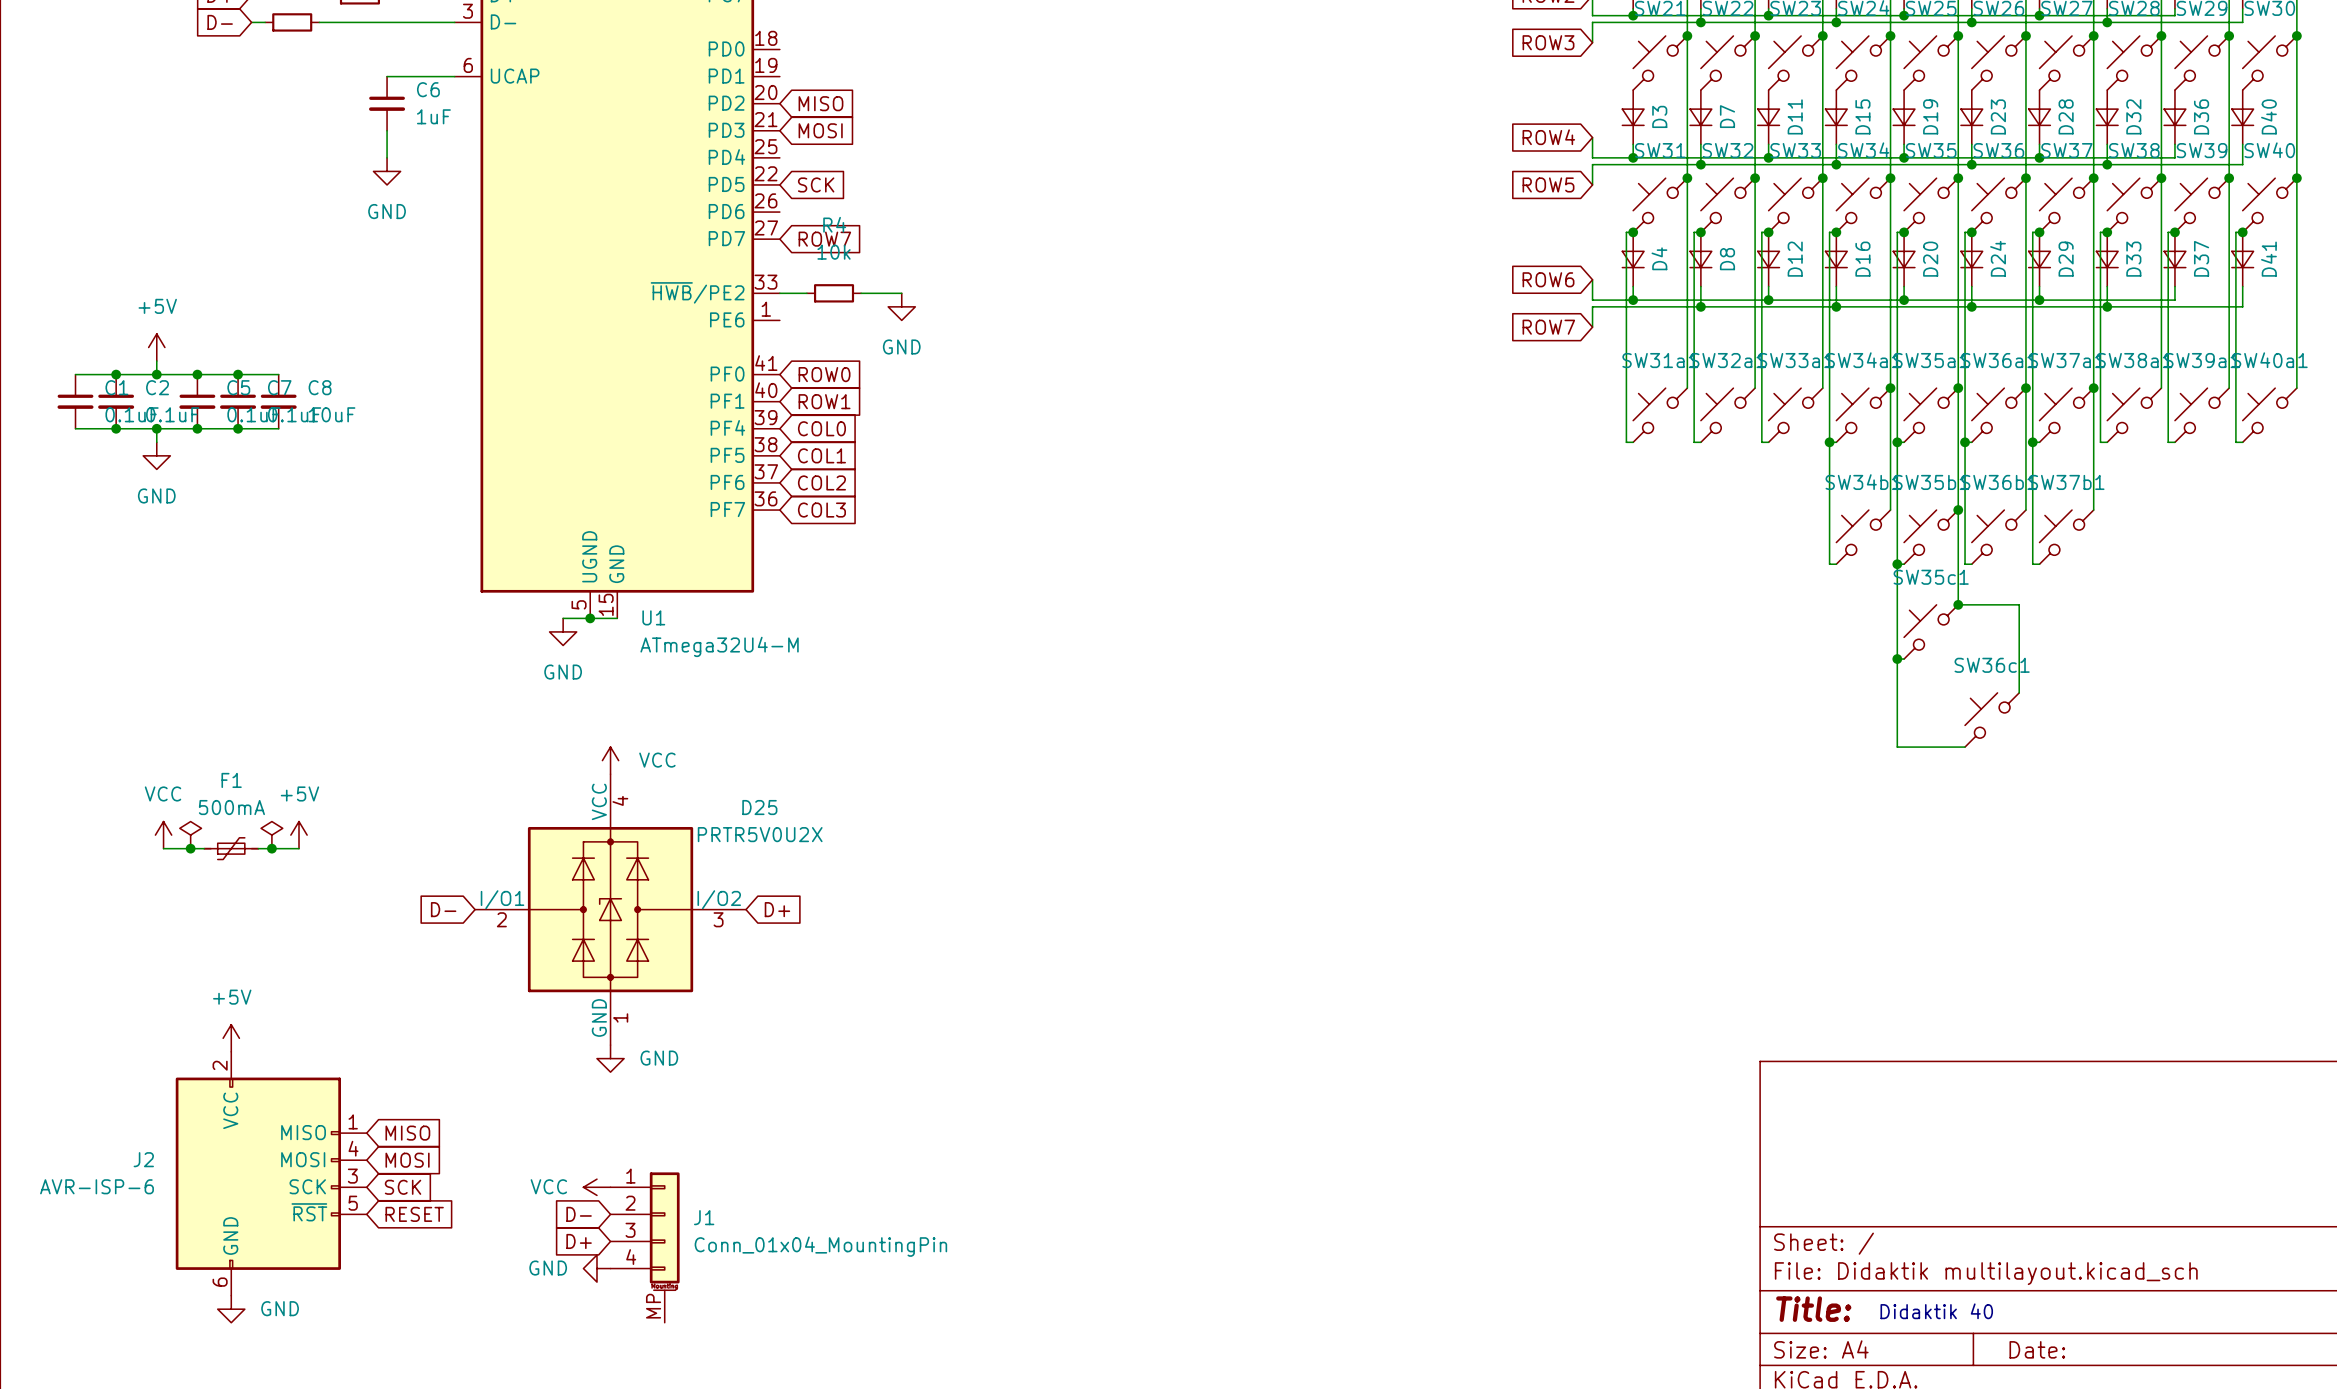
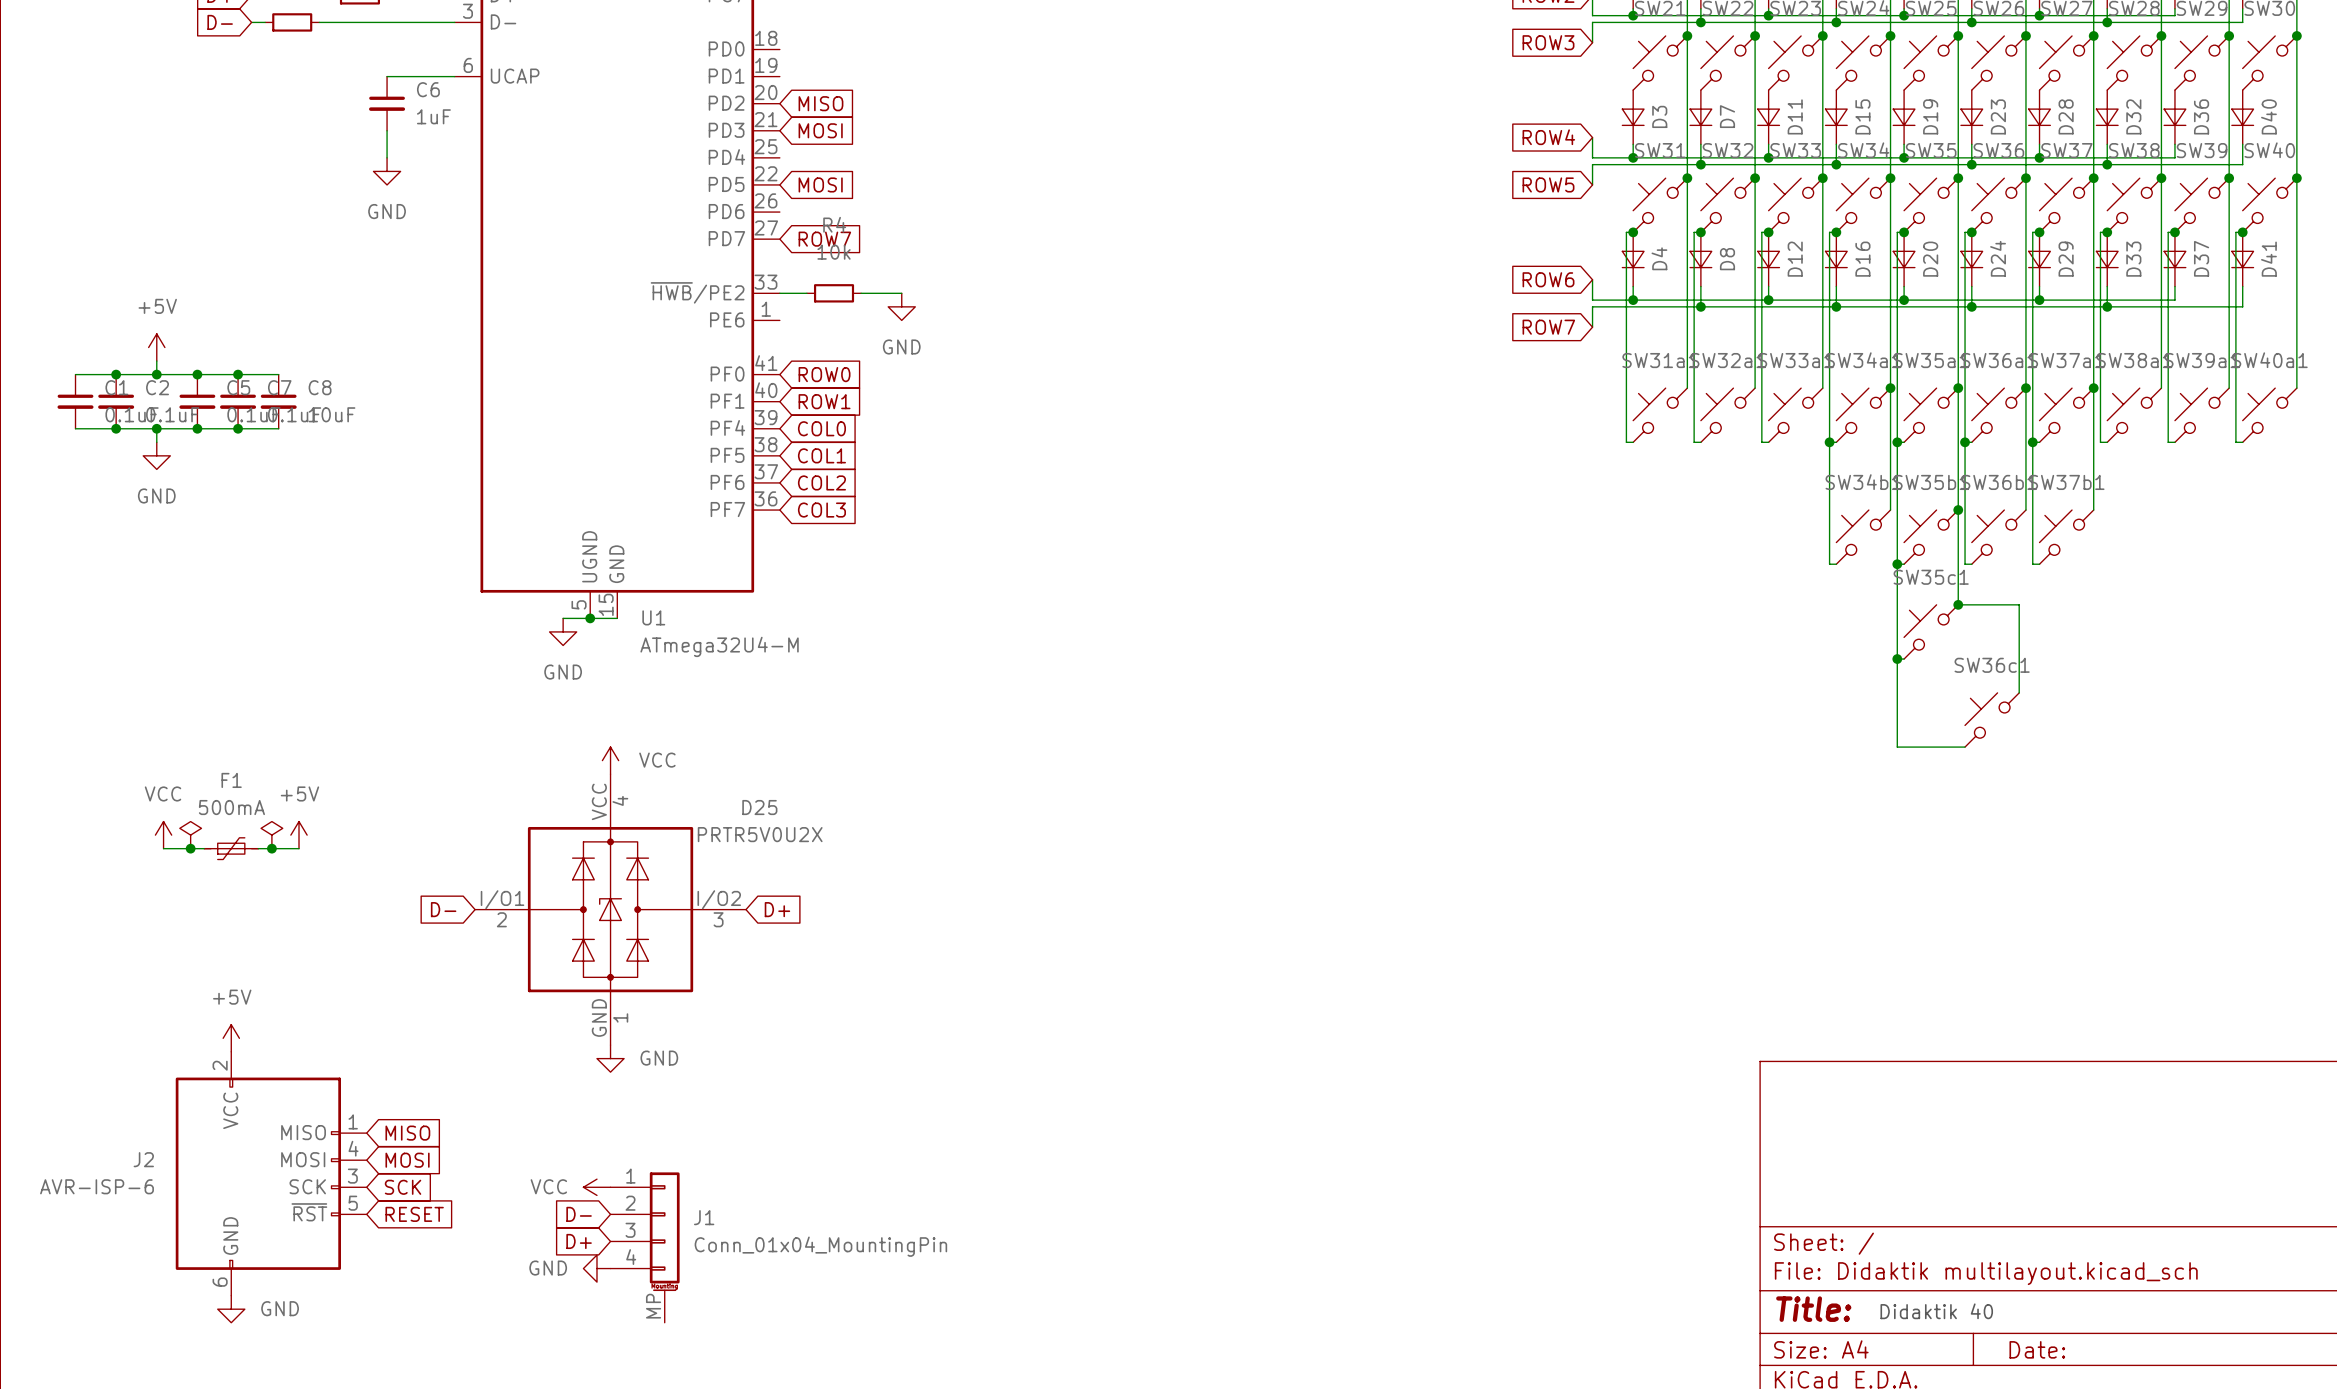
global label: SCK (816, 184) -> MOSI (820, 184)

